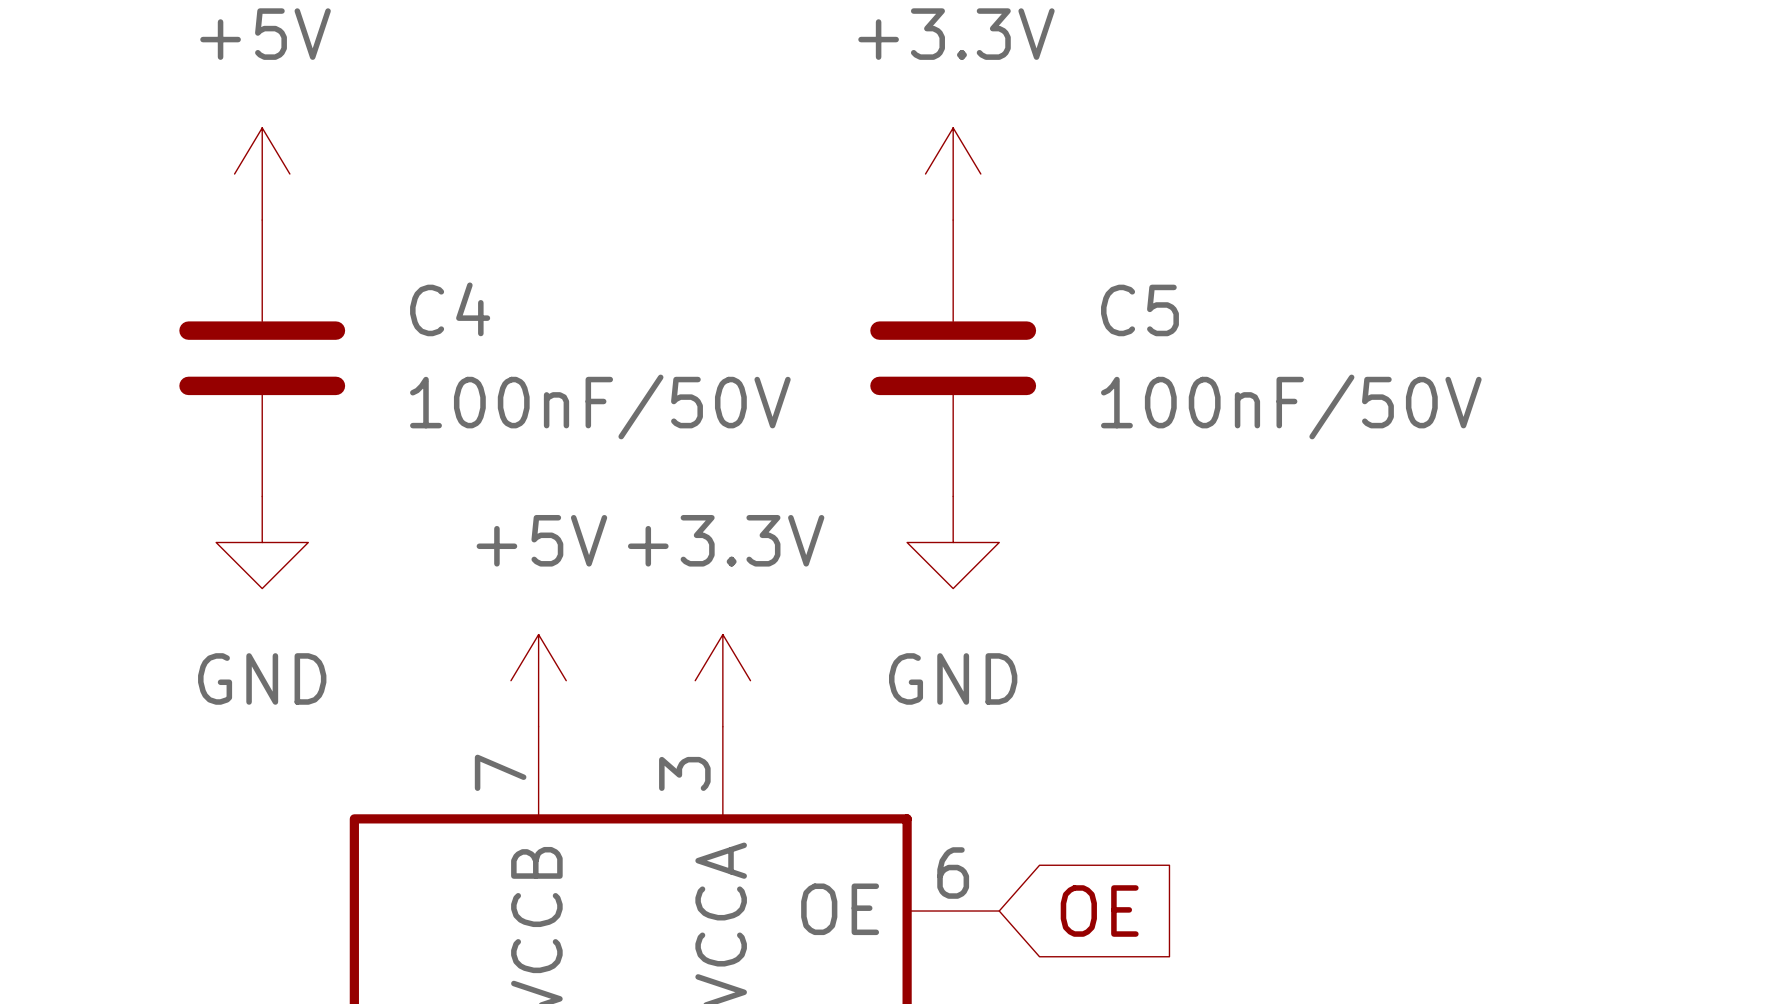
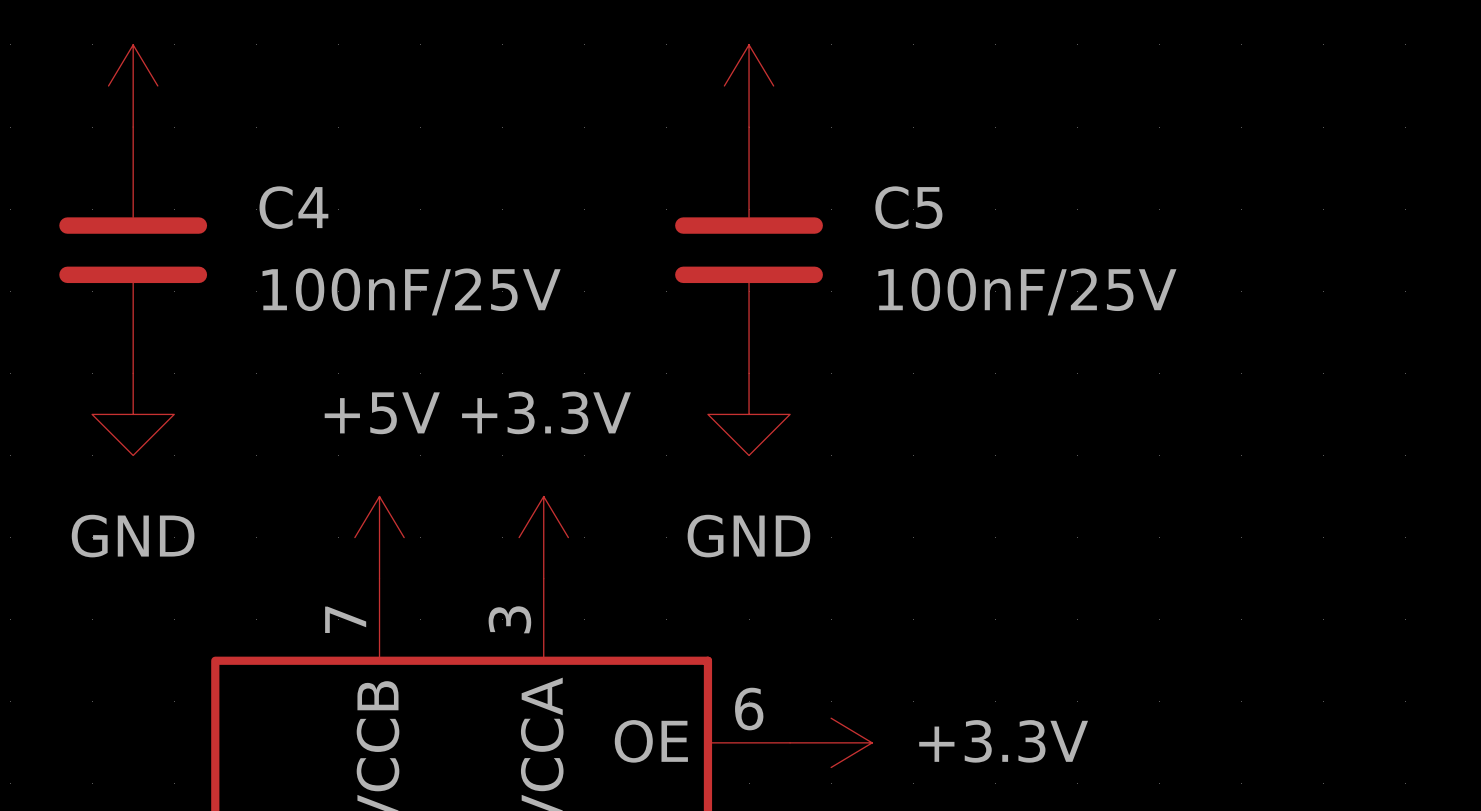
C4 value: 100nF/50V (600, 406) -> 100nF/25V (411, 291)
C5 value: 100nF/50V (1291, 406) -> 100nF/25V (1027, 291)
power symbol: none -> +3.3V (831, 742)
global label: OE (1099, 911) -> none

